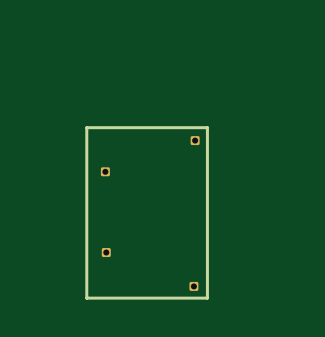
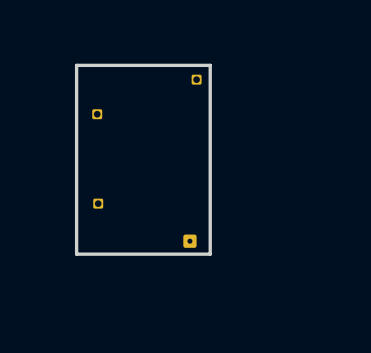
part footprint: [189, 281, 199, 291] -> [183, 234, 197, 248]

